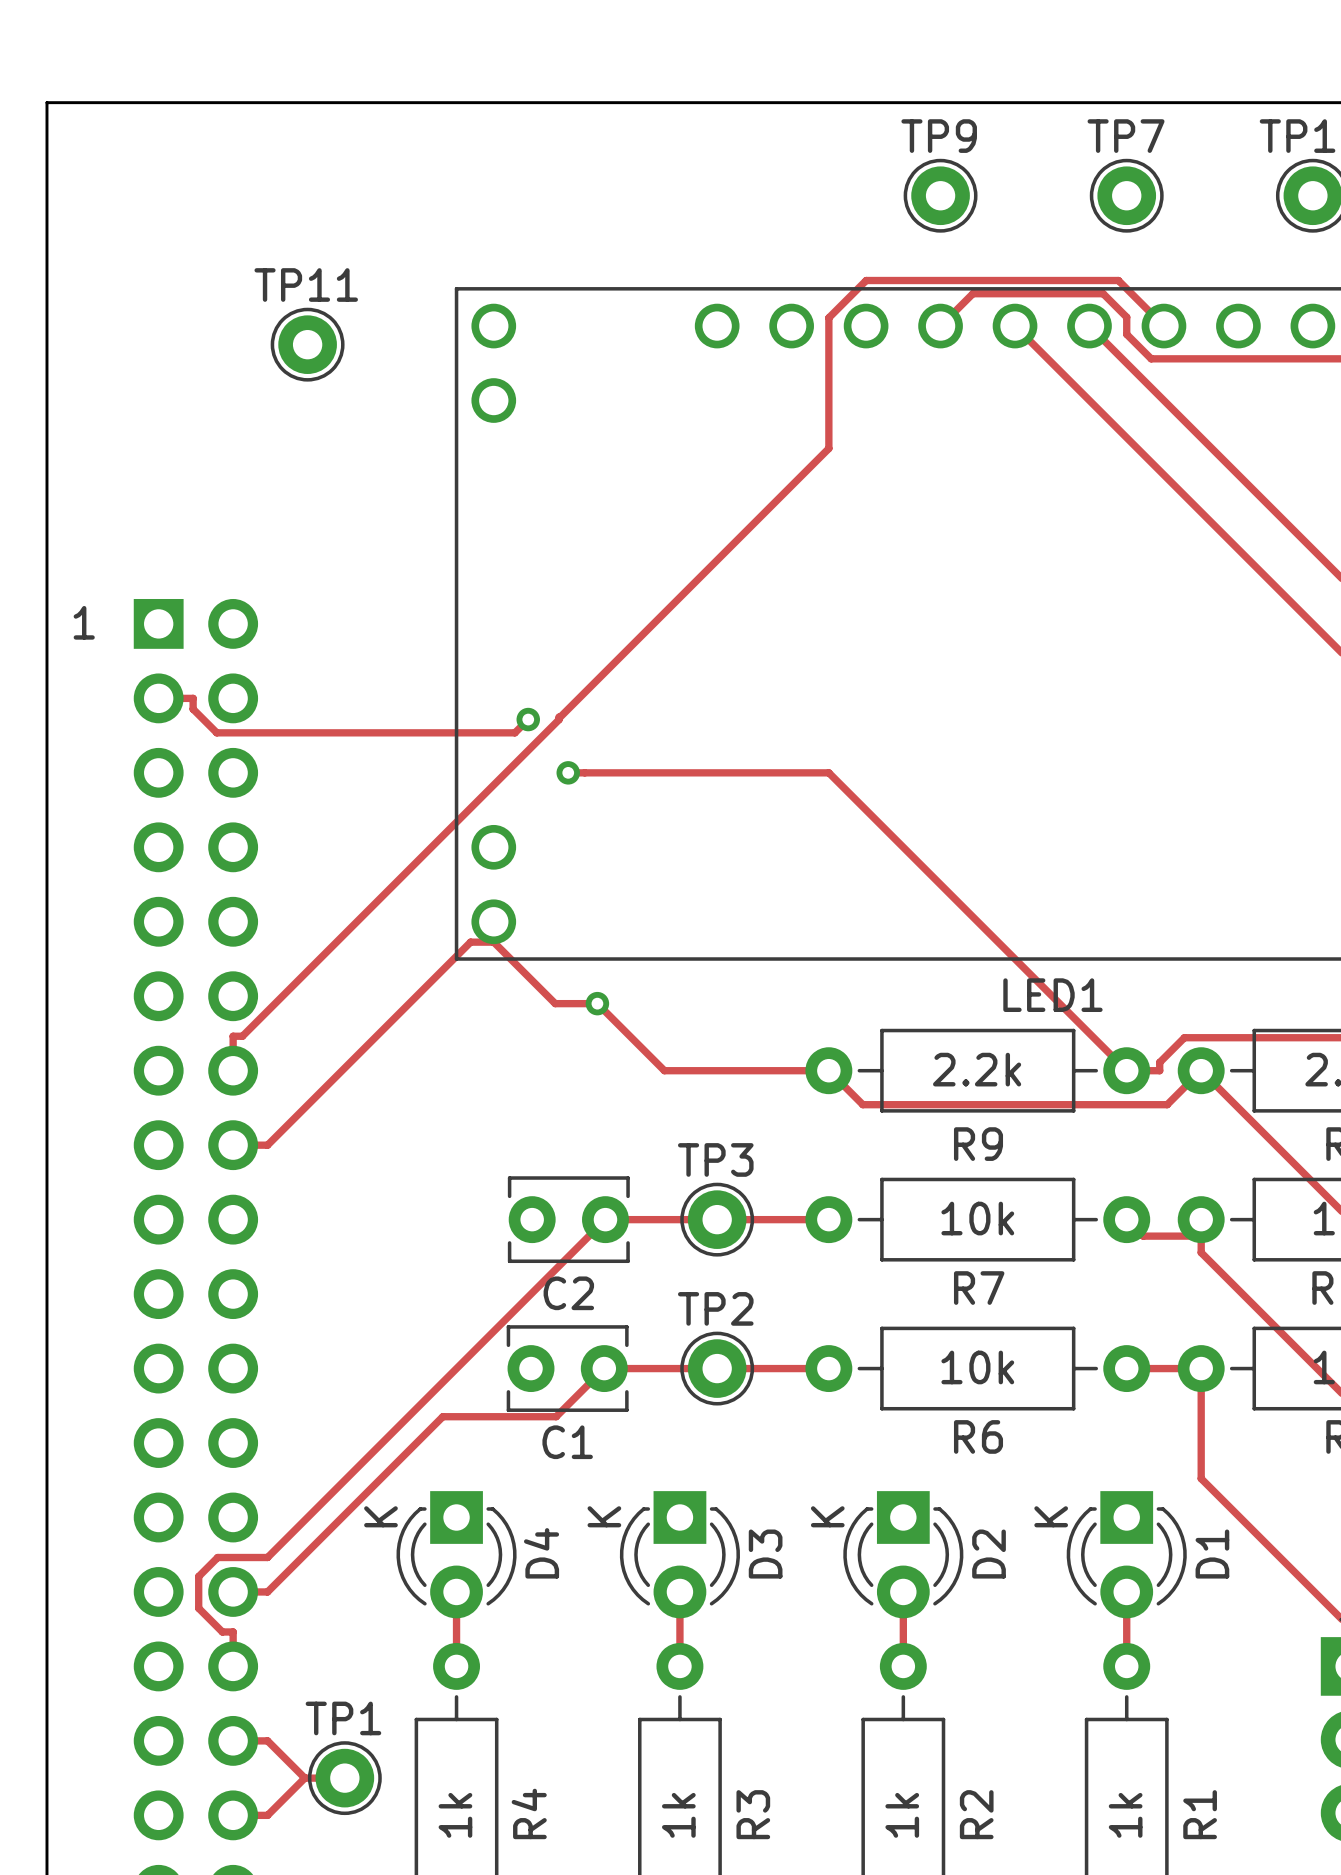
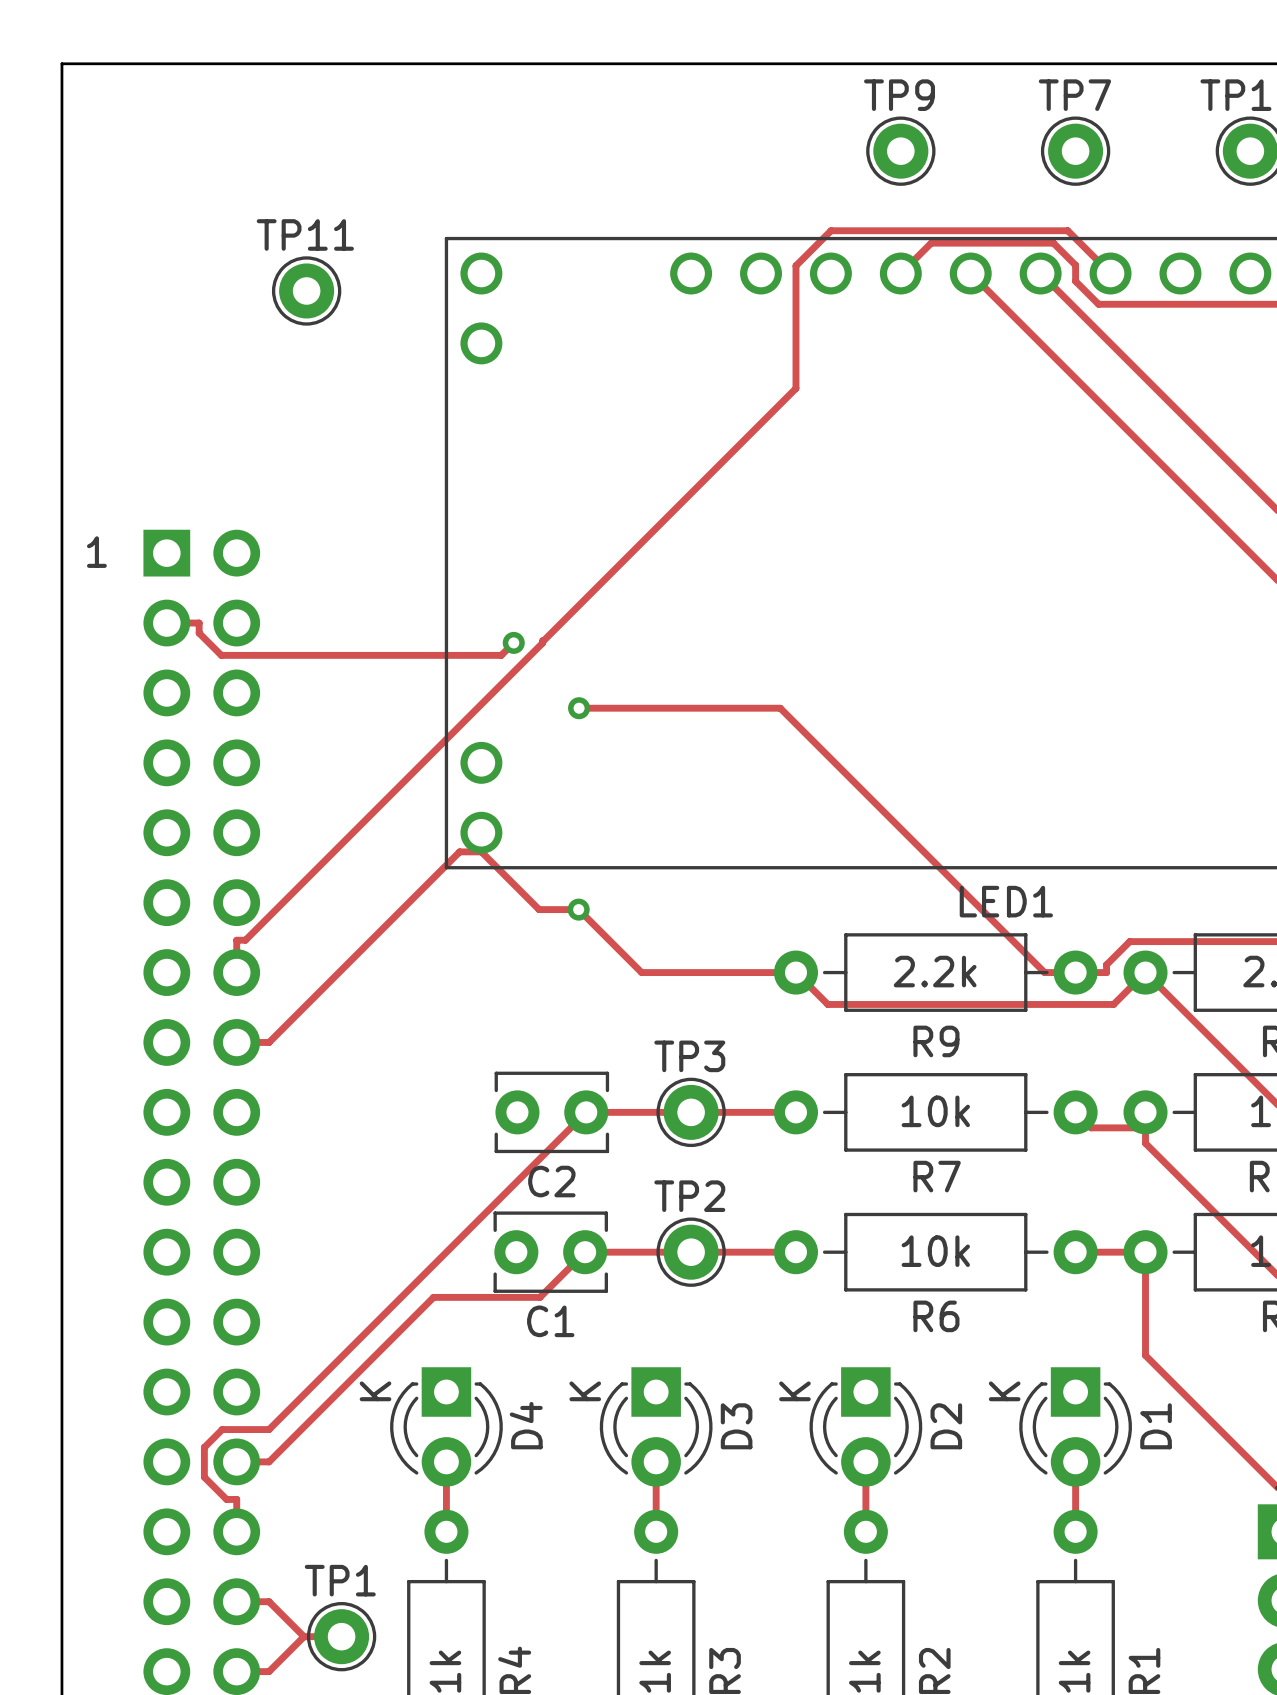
track: (568, 772) (828, 772) (1126, 1070) -> (579, 708) (780, 708) (1044, 972) (1075, 972)
via position: (568, 772) -> (579, 708)

